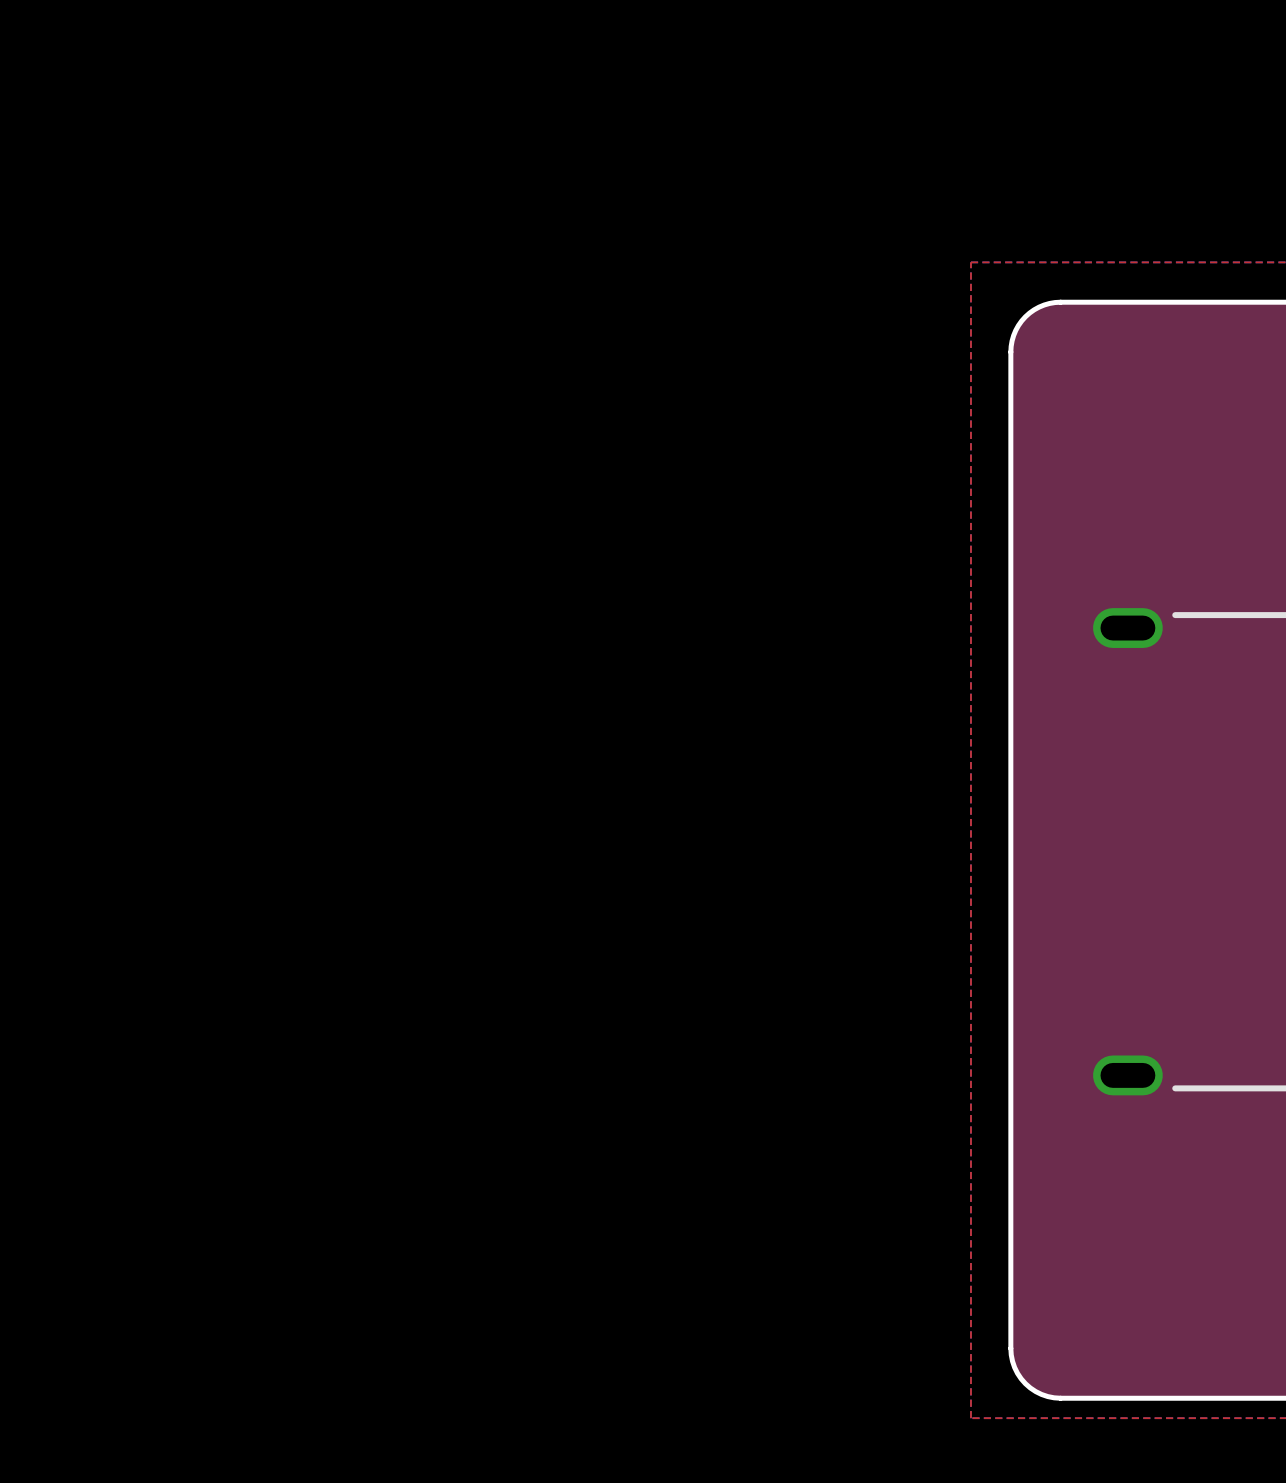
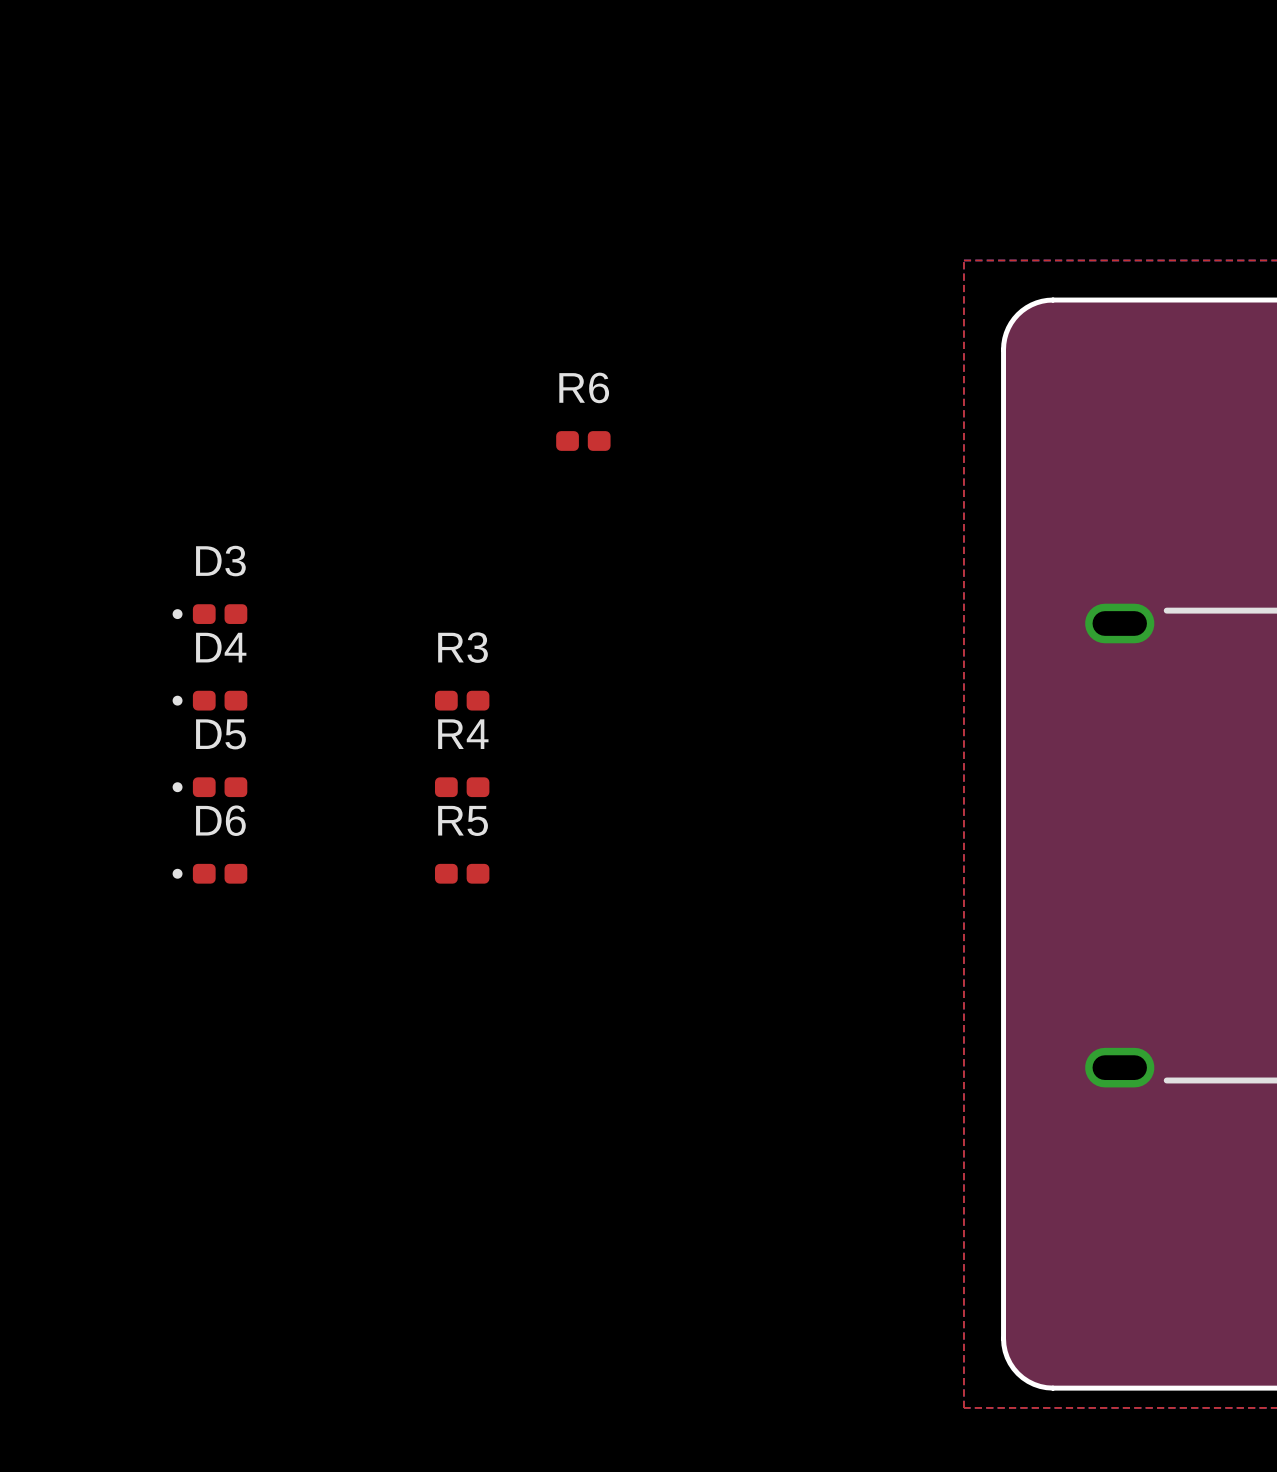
R6: none -> (583, 440)
D3: none -> (209, 614)
D4: none -> (209, 700)
R3: none -> (462, 700)
D5: none -> (209, 787)
R4: none -> (462, 787)
D6: none -> (209, 873)
R5: none -> (462, 873)

